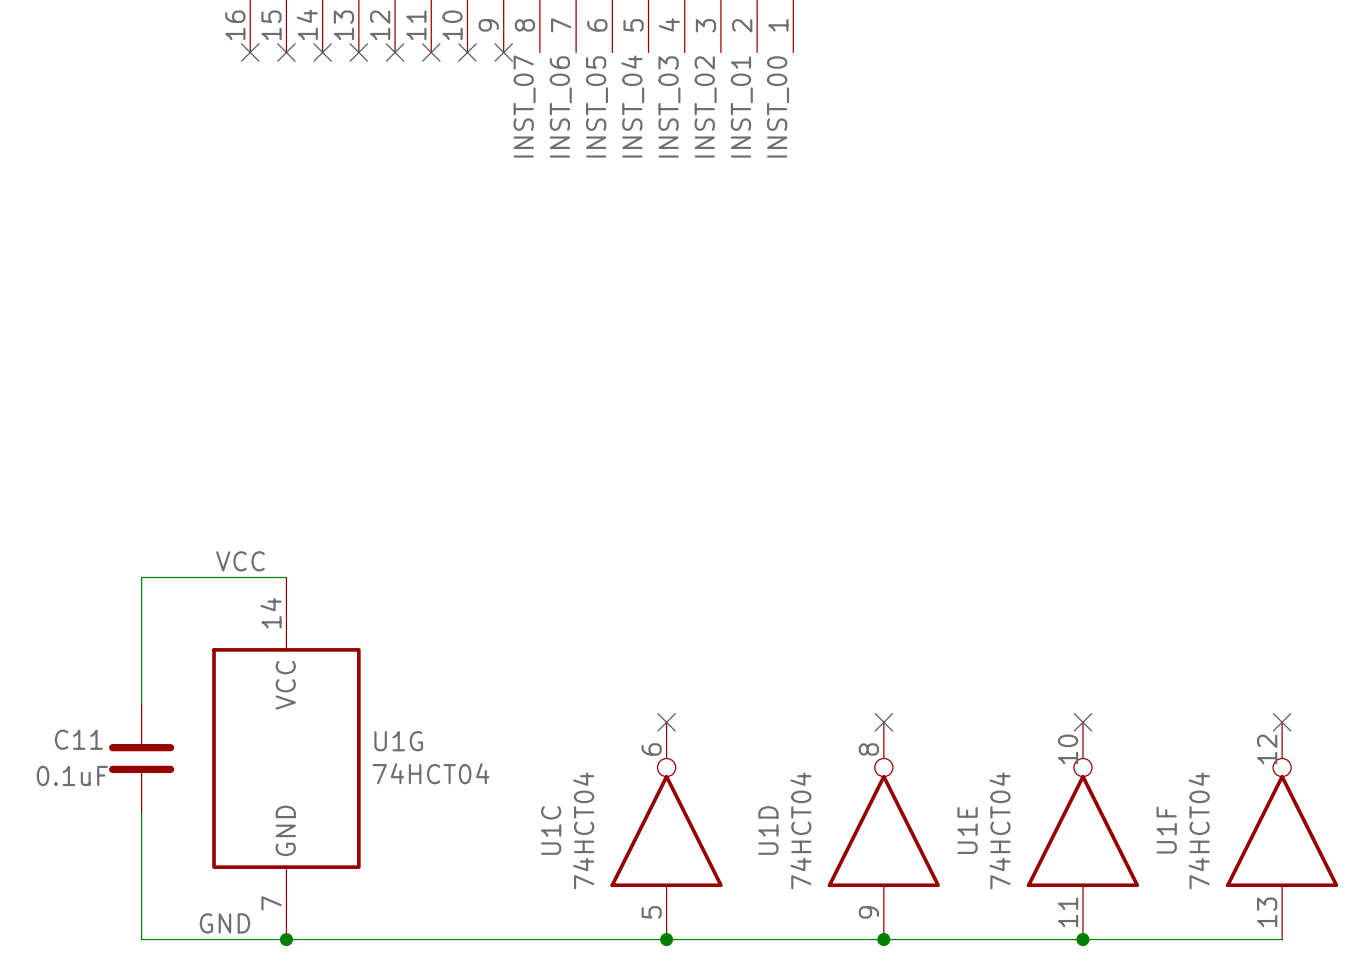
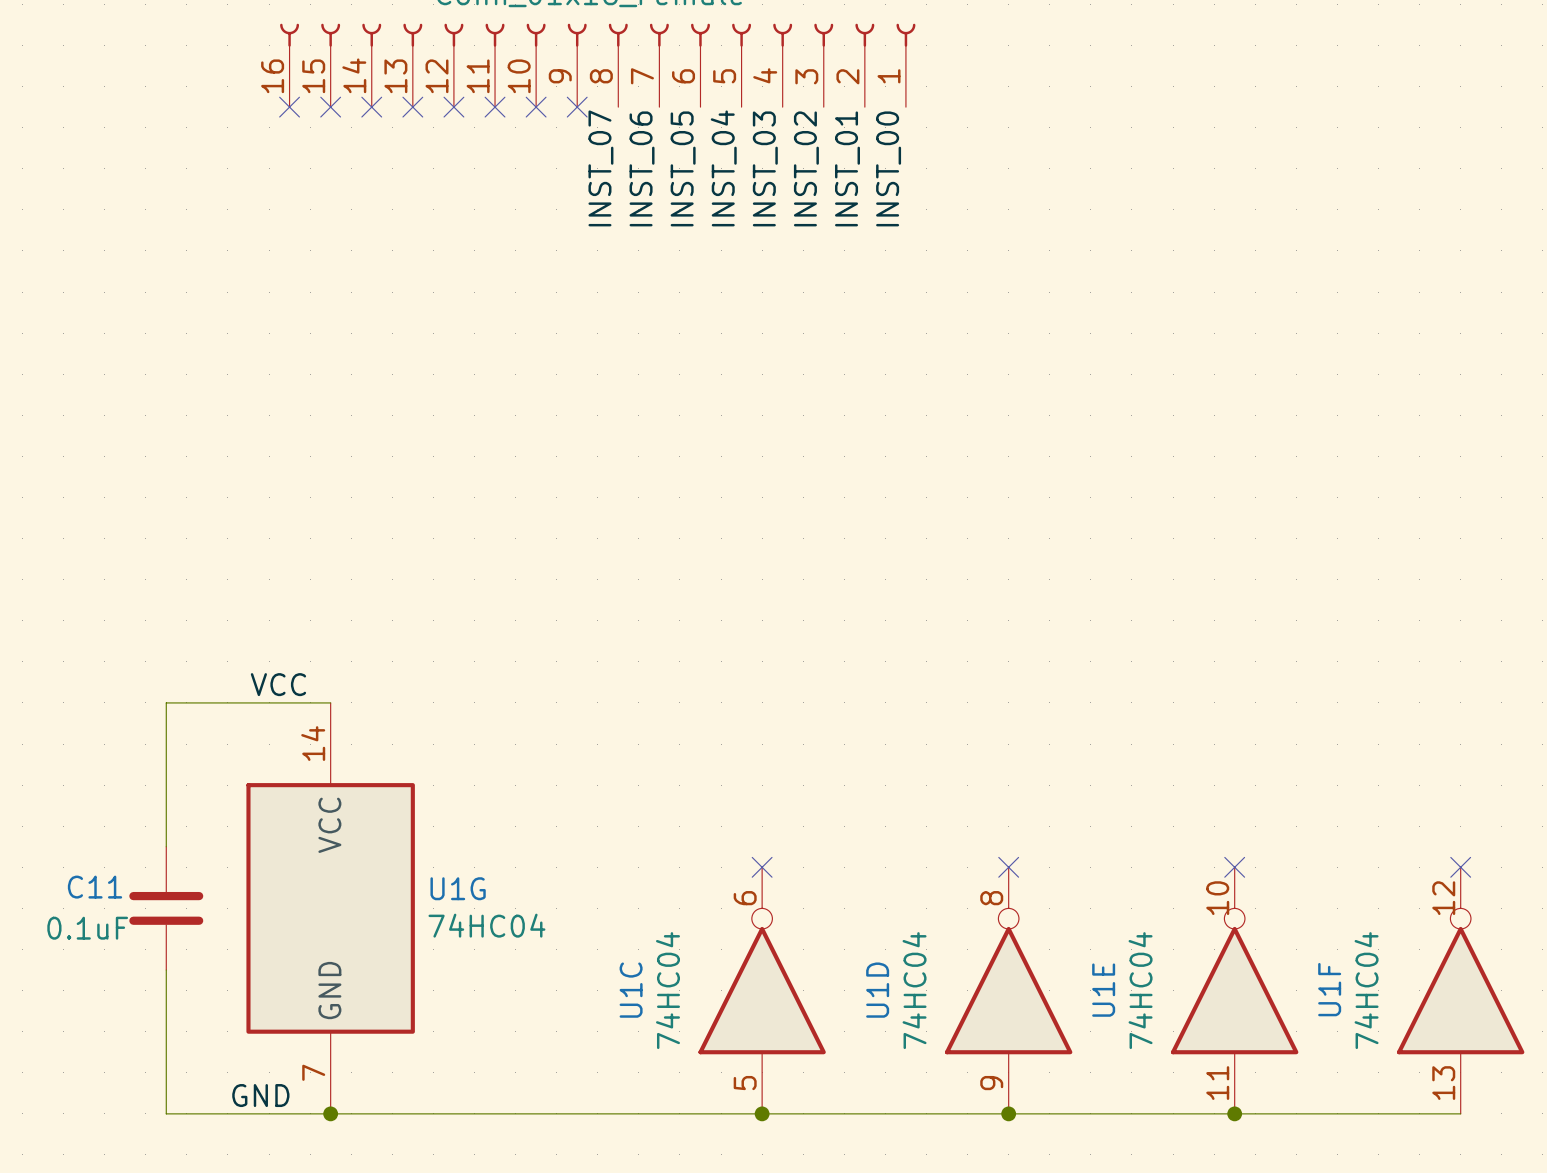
U1G value: 74HCT04 (431, 773) -> 74HC04 (486, 925)
U1C value: 74HCT04 (583, 830) -> 74HC04 (667, 990)
U1D value: 74HCT04 (800, 830) -> 74HC04 (914, 990)
U1E value: 74HCT04 (1000, 830) -> 74HC04 (1140, 990)
U1F value: 74HCT04 (1199, 830) -> 74HC04 (1366, 990)

